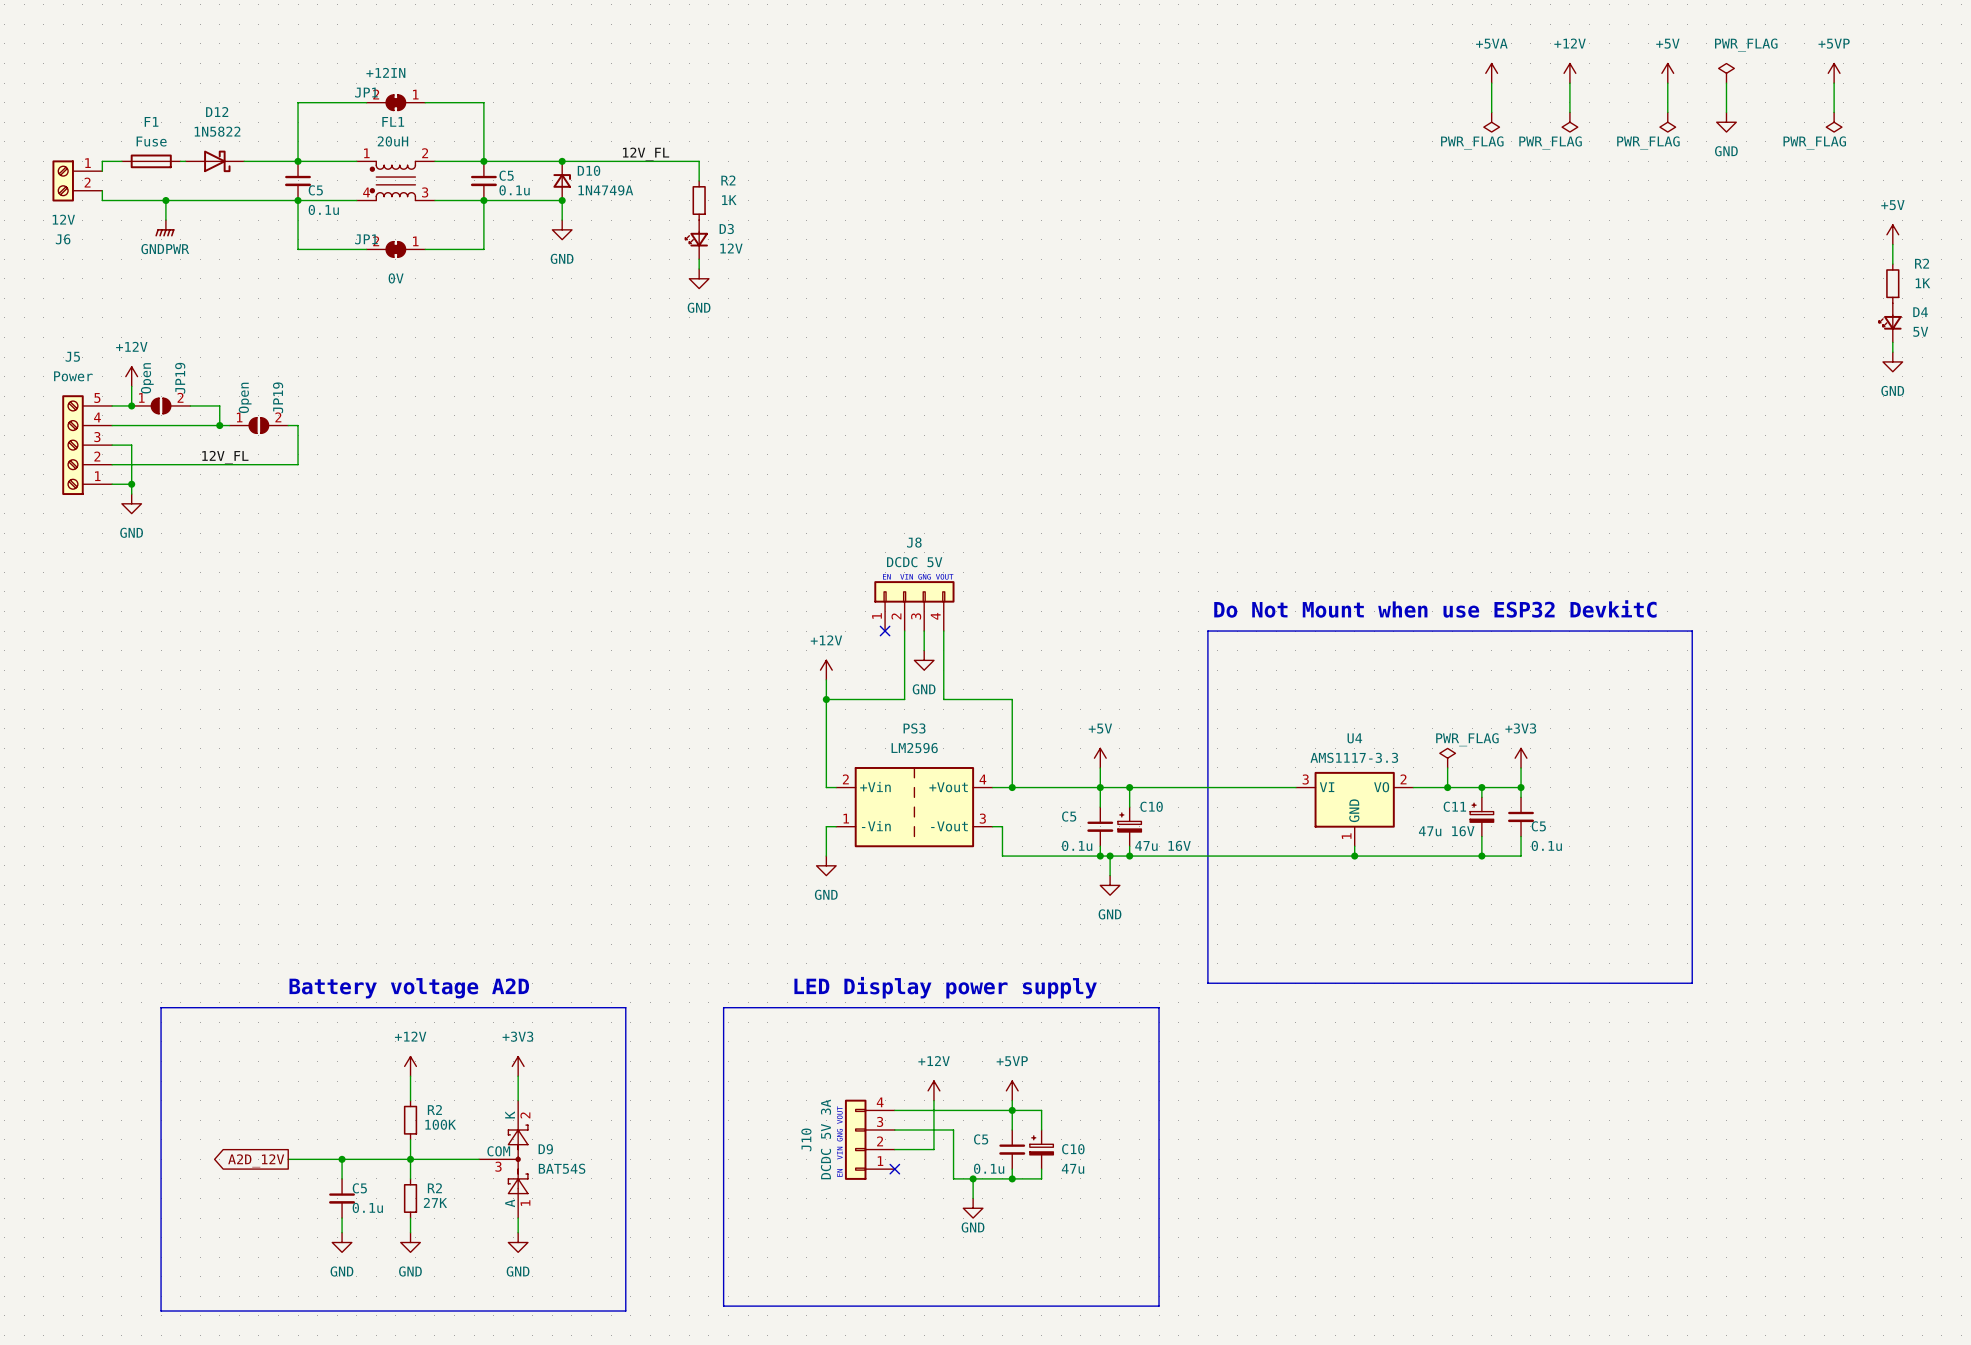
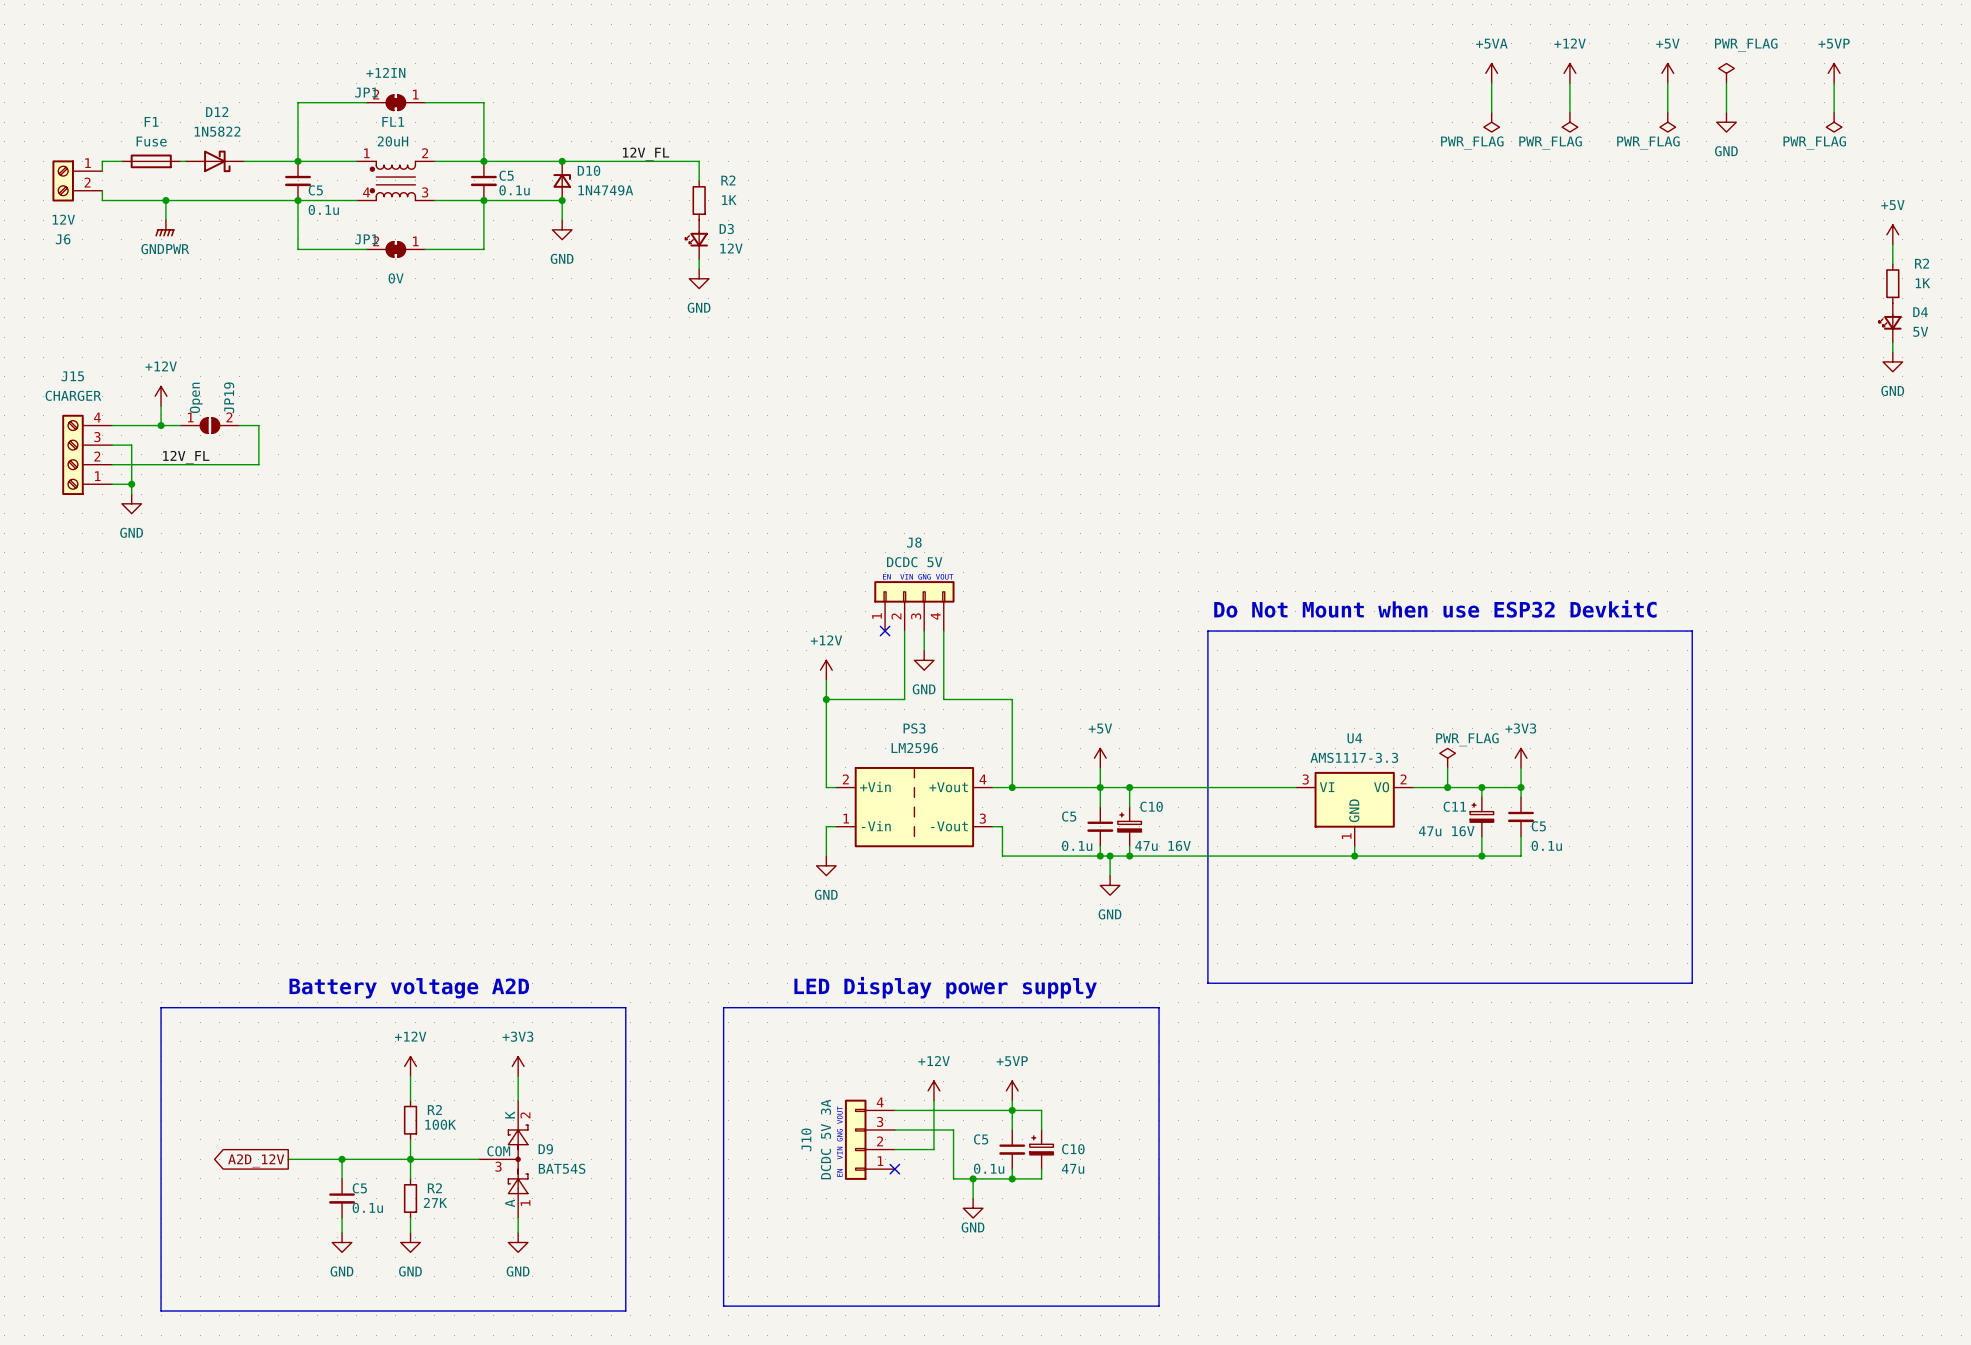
power symbol position: +12V (131, 376) -> +12V (161, 396)
wire: (131, 386) (131, 405) (112, 405) -> none
junction: (131, 405) -> none
wire: none -> (161, 405) (161, 425)
JP19: Open (161, 405) -> none
wire: (190, 405) (219, 405) (219, 425) -> none
junction: none -> (161, 425)
JP19: none -> Open (209, 425)
junction: (219, 425) -> none
JP19: Open (258, 425) -> none
wire: (288, 425) (298, 425) (298, 464) (258, 464) -> (239, 425) (258, 425) (258, 464)
J5: Power (87, 445) -> none
J15: none -> CHARGER (87, 454)
label position: 12V_FL (225, 457) -> 12V_FL (186, 457)

